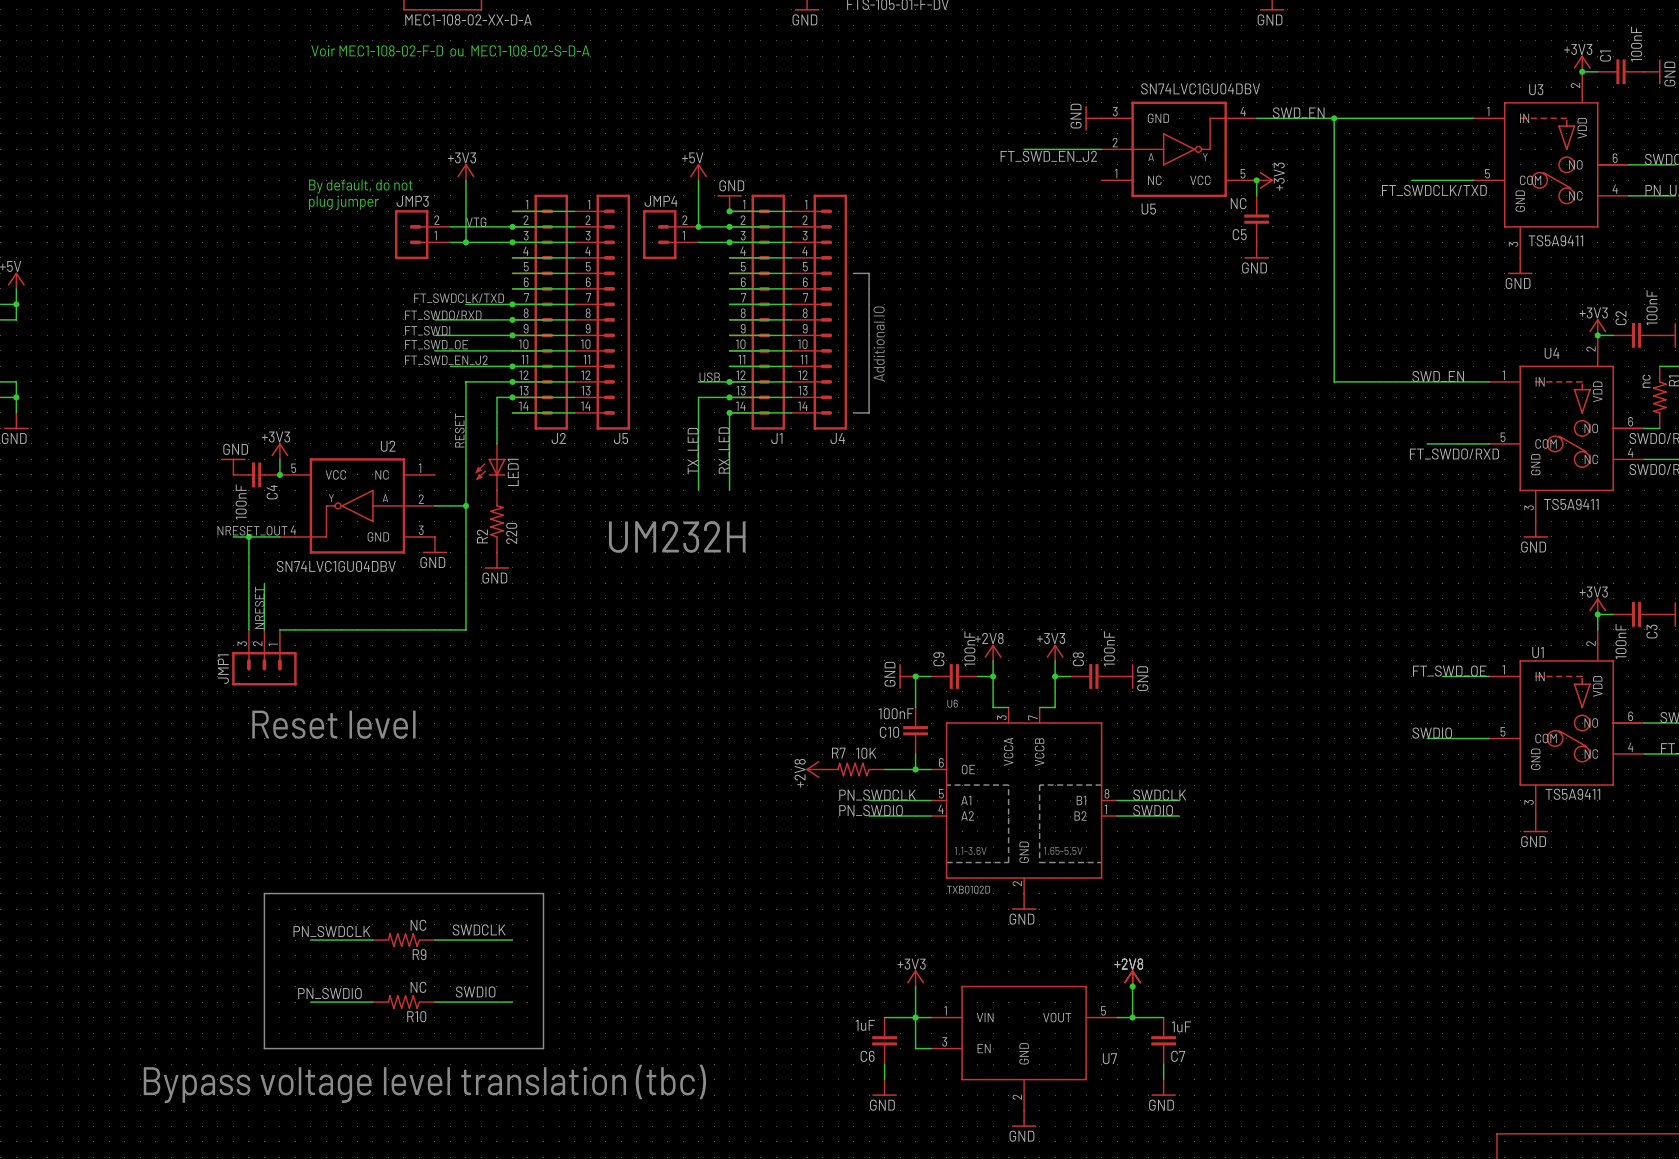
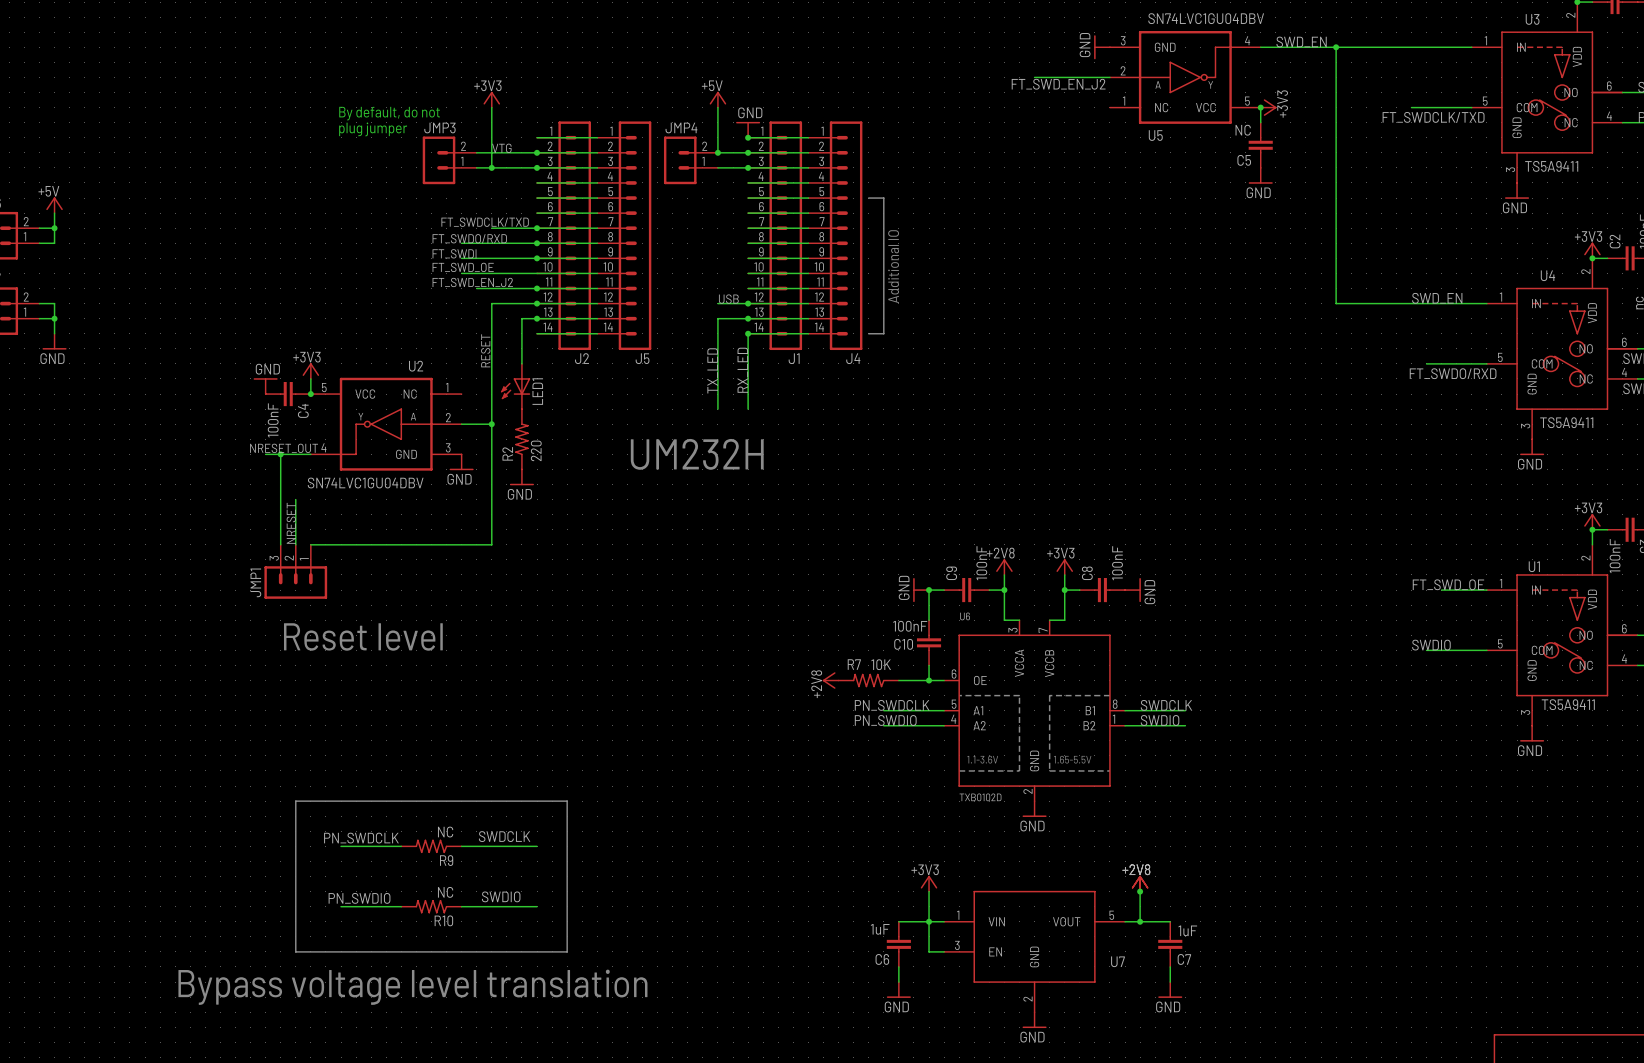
text: Bypass voltage level translation (tbc) (424, 1083) -> Bypass voltage level translation (412, 987)

